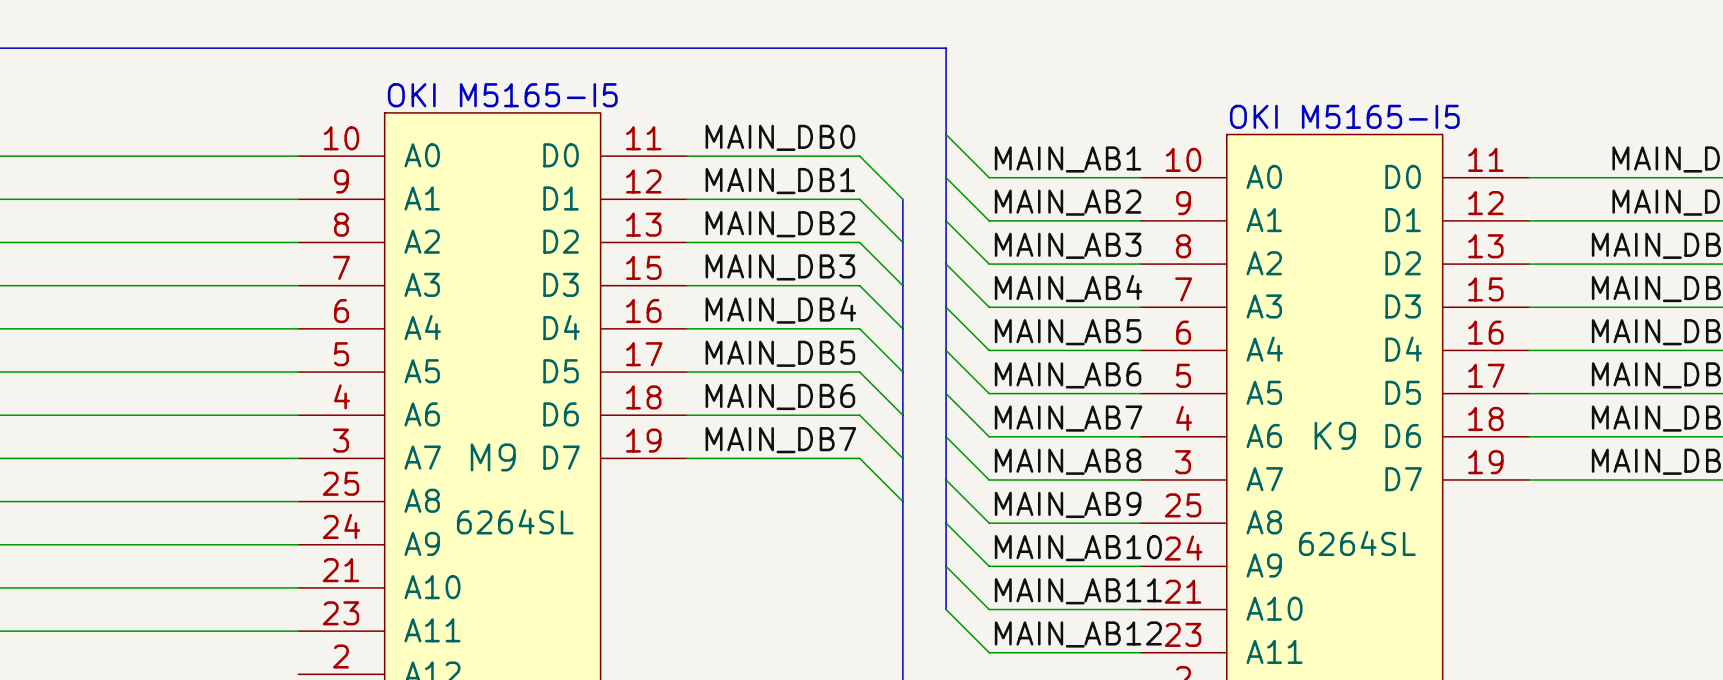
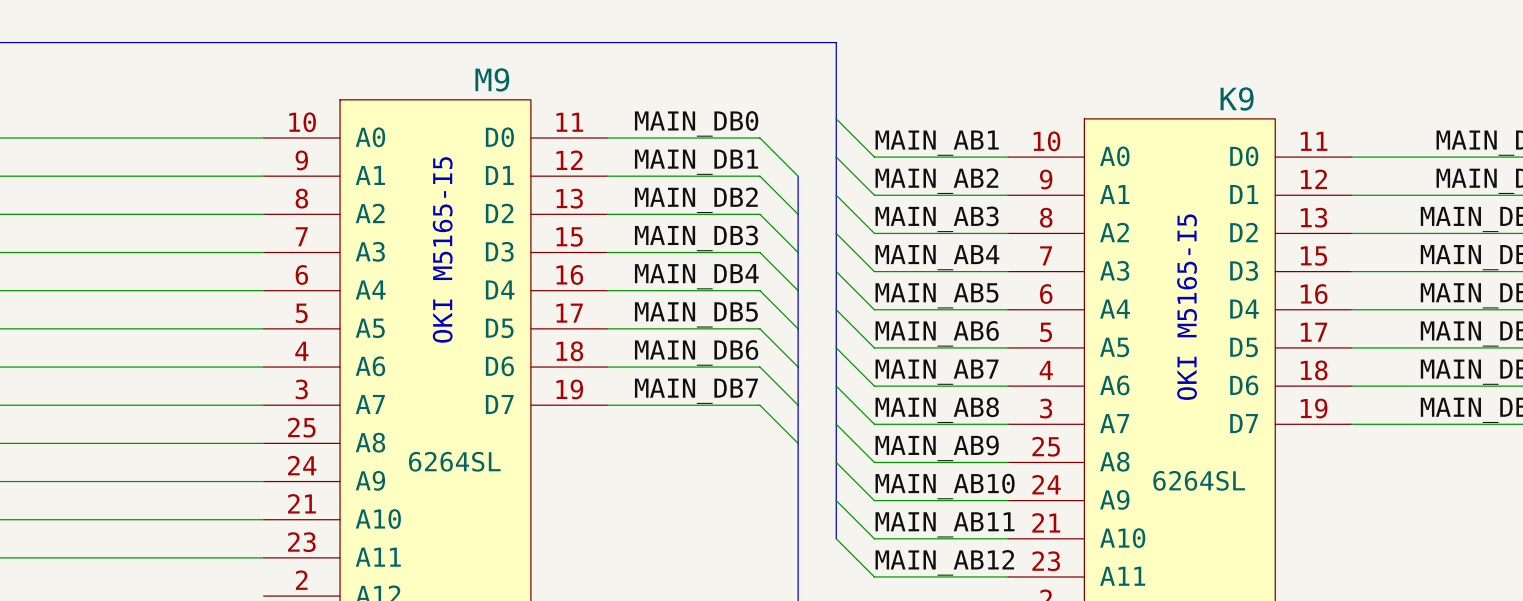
text rotation: 0° (502, 95) -> 90° counterclockwise (442, 249)
text rotation: 0° (1344, 116) -> 90° counterclockwise (1187, 307)
K9 name position: K9 (1335, 435) -> K9 (1237, 99)
M9 name position: M9 (493, 457) -> M9 (492, 79)

